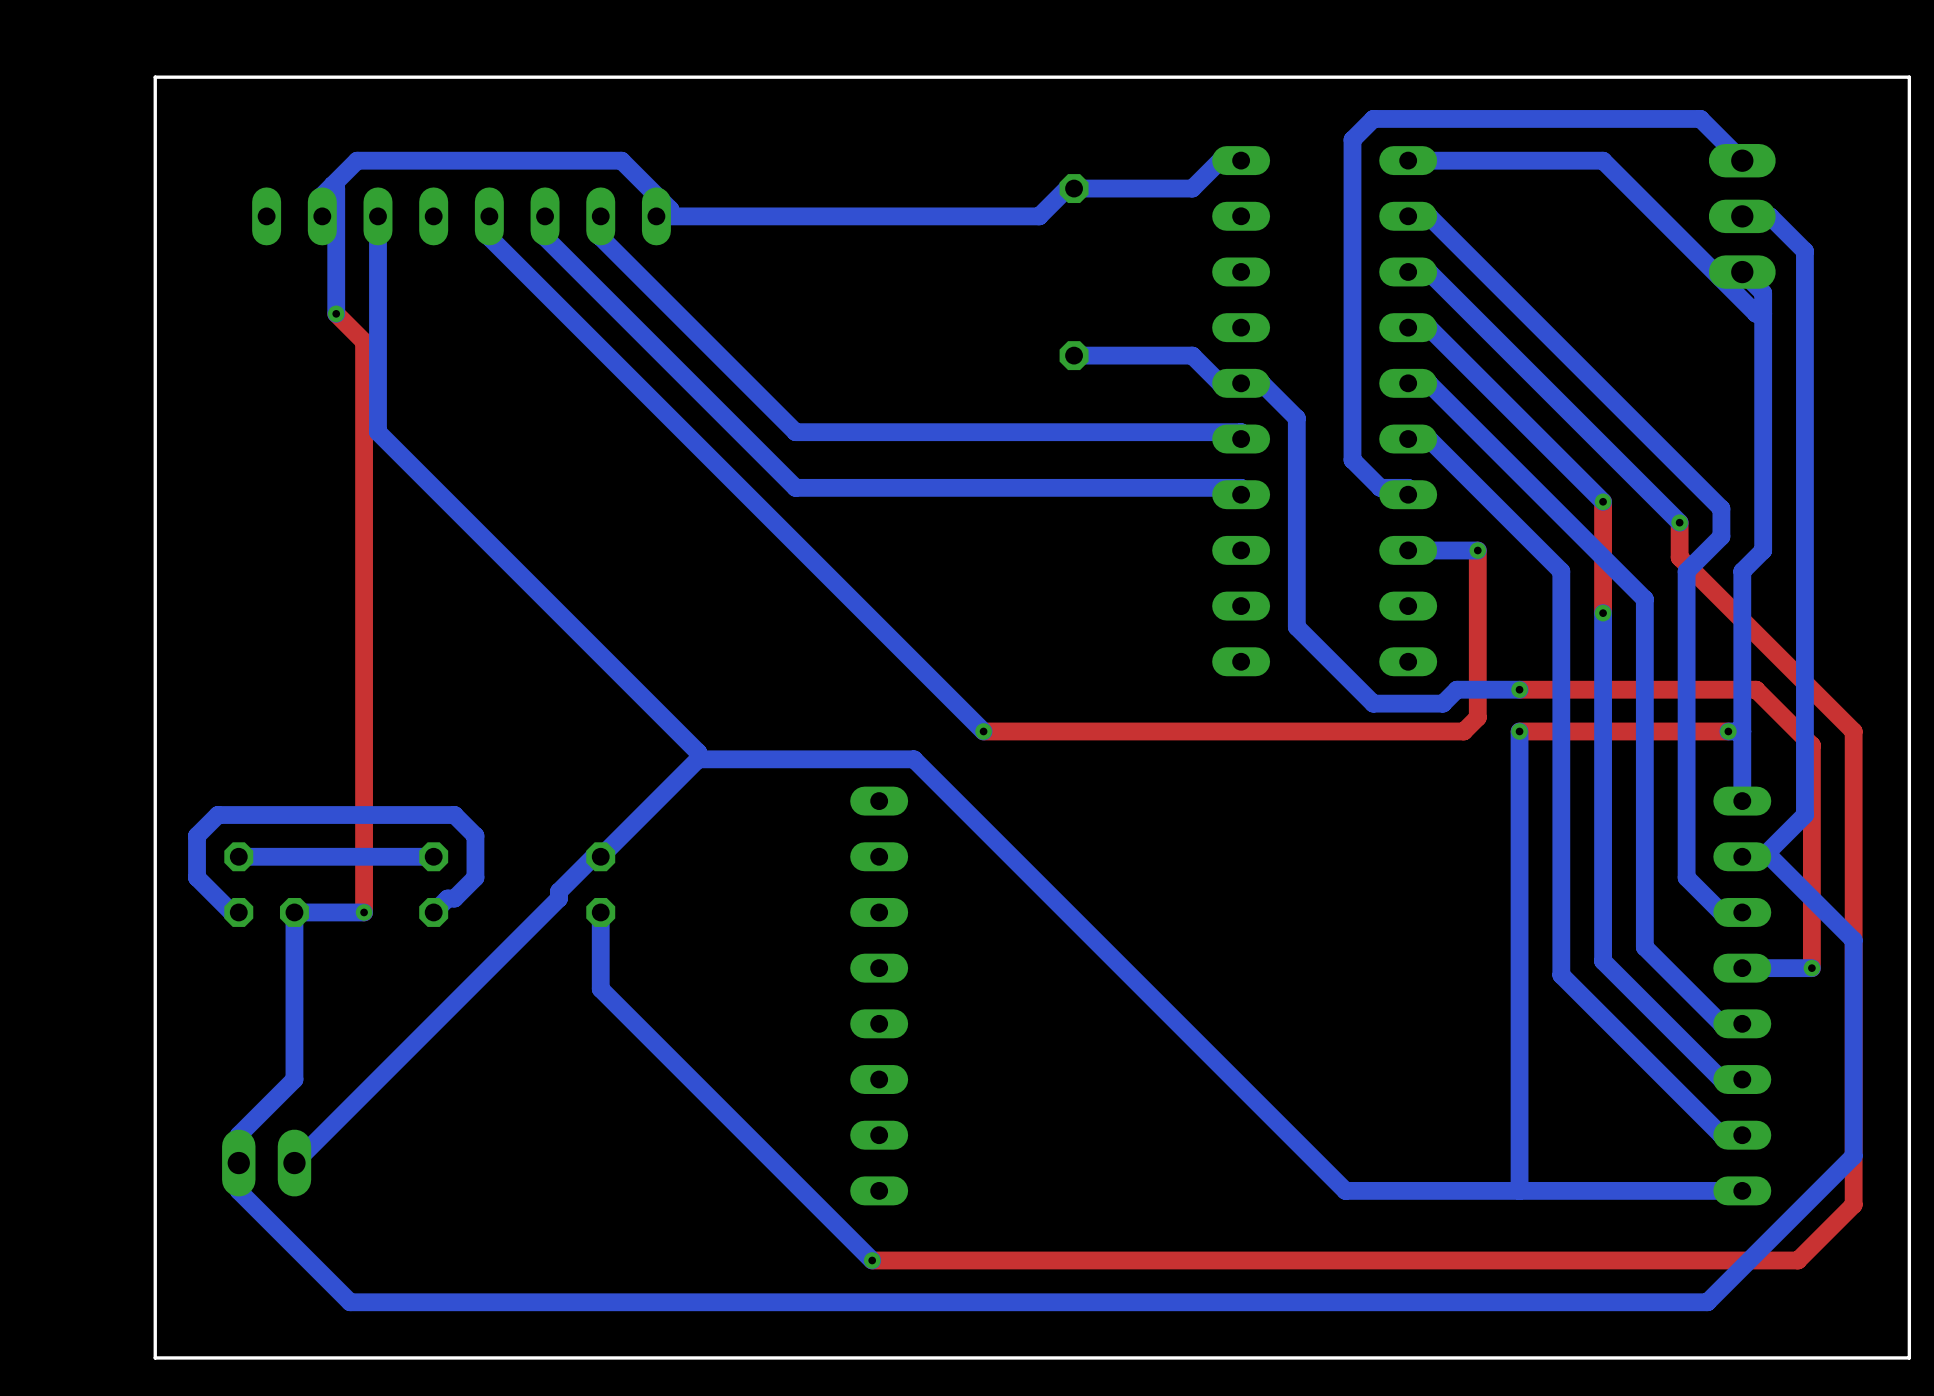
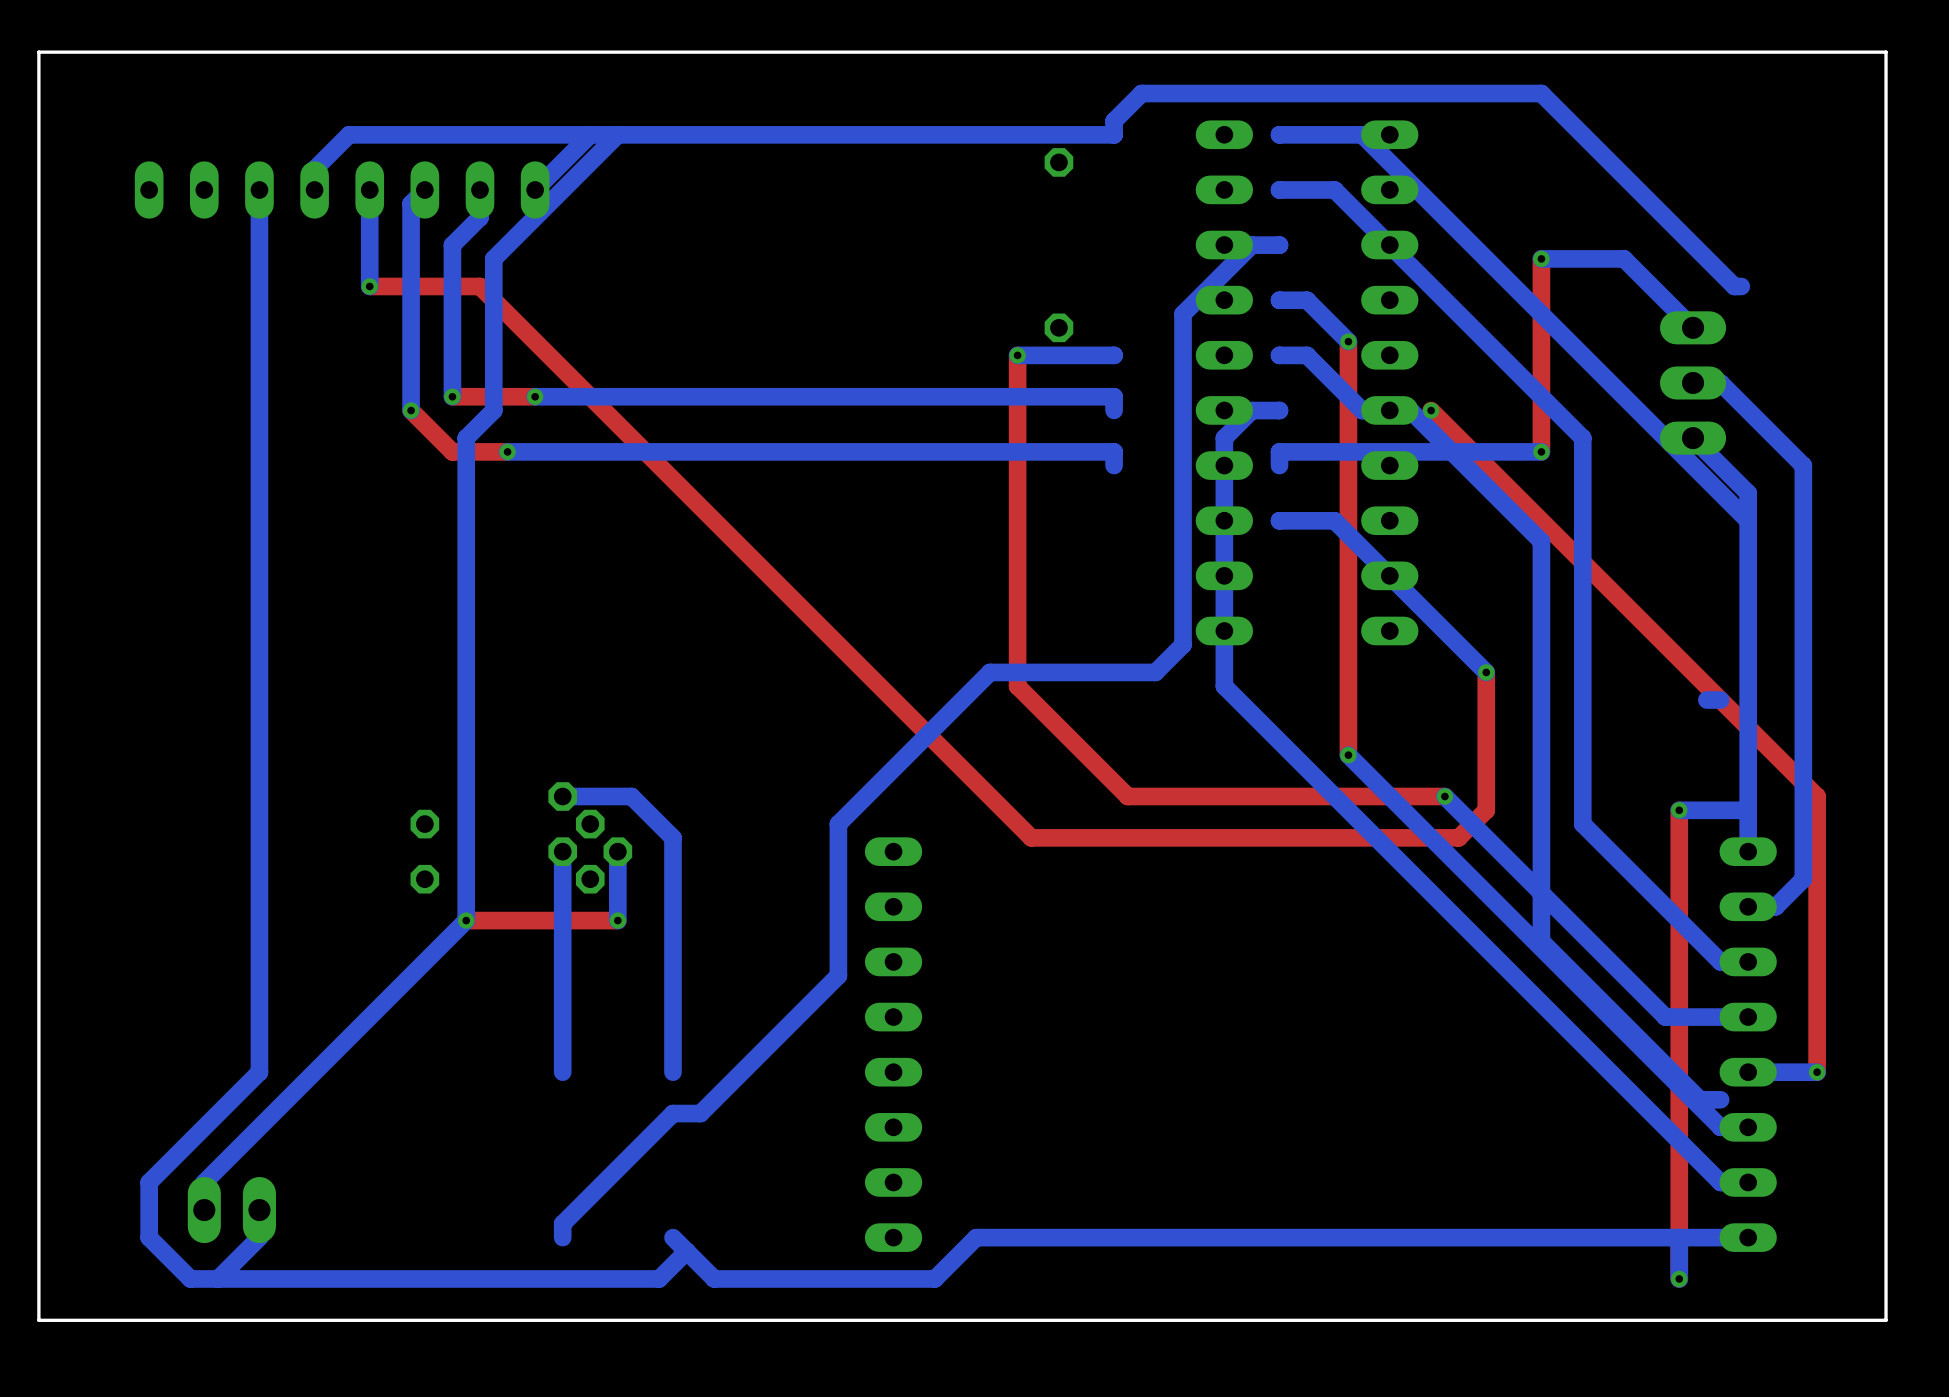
board edge: (155, 77) (155, 1357) -> (149, 52) (38, 52) (38, 1320) (149, 1320)
bottom track: (1373, 118) (1352, 139) (1352, 460) (1380, 487) (1408, 487) (1408, 494) -> none
bottom track: (1561, 118) (1700, 118) (1742, 160) -> (1541, 93) (1582, 134)
bottom track: (1241, 160) (1220, 160) (1192, 188) (1067, 188) (1039, 216) (656, 216) (670, 209) (621, 160) -> (1355, 93) (1141, 93) (1114, 121) (1114, 134) (610, 134)
bottom track: none -> (1279, 134) (1362, 134) (1748, 520)
bottom track: (1603, 160) (1408, 160) -> none
bottom track: (332, 185) (336, 188) (336, 313) -> none
bottom track: none -> (424, 189) (411, 203) (411, 410)
part position: (461, 216) -> (342, 189)
bottom track: (545, 216) (545, 237) (795, 487) (1241, 487) -> (535, 189) (590, 134)
bottom track: (600, 216) (600, 237) (795, 432) (1241, 432) (1241, 439) -> none
bottom track: none -> (1279, 189) (1334, 189) (1582, 438) (1582, 582)
bottom track: (1408, 216) (1429, 216) (1721, 508) (1721, 536) (1686, 571) (1686, 877) (1721, 912) (1742, 912) -> none
bottom track: (1742, 216) (1770, 216) (1804, 251) (1804, 815) (1763, 856) -> none
part position: (1742, 216) -> (1693, 382)
bottom track: (489, 237) (983, 731) -> (480, 210) (480, 217) (452, 245) (452, 396)
bottom track: none -> (1279, 245) (1251, 245) (1183, 314) (1183, 644) (1155, 672) (990, 672) (838, 824) (838, 975) (700, 1113) (672, 1113) (562, 1223) (562, 1237)
bottom track: (1408, 272) (1429, 272) (1679, 522) -> none
bottom track: (1742, 272) (1763, 292) (1763, 550) (1742, 571) (1742, 801) -> none
bottom track: none -> (1541, 258) (1624, 258) (1693, 327)
top track: none -> (1541, 258) (1541, 451)
via: none -> (1541, 258)
top track: (336, 313) (364, 341) (364, 912) -> none
via position: (336, 313) -> (369, 286)
bottom track: (377, 313) (377, 432) (698, 752) (698, 759) -> none
top track: none -> (369, 286) (480, 286) (1031, 837) (1458, 837) (1486, 810) (1486, 672)
bottom track: none -> (1279, 300) (1307, 300) (1348, 341)
bottom track: (1408, 327) (1429, 327) (1603, 501) -> none
bottom track: (1074, 355) (1192, 355) (1220, 383) (1262, 383) (1296, 418) (1296, 480) -> (1541, 451) (1279, 451)
top track: none -> (1348, 341) (1348, 755)
via: none -> (1348, 341)
top track: none -> (1017, 355) (1017, 686) (1127, 796) (1444, 796)
via: none -> (1017, 355)
bottom track: none -> (1114, 355) (1017, 355)
bottom track: none -> (1279, 355) (1307, 355) (1362, 410) (1389, 410)
bottom track: (1408, 383) (1429, 383) (1644, 599) (1644, 947) (1721, 1023) (1742, 1023) -> none
bottom track: none -> (1693, 382) (1720, 382) (1803, 465) (1803, 879) (1775, 906) (1748, 906)
via: none -> (452, 396)
bottom track: none -> (535, 396) (1114, 396) (1114, 410)
top track: none -> (535, 396) (452, 396)
via: none -> (535, 396)
top track: none -> (411, 410) (452, 451) (507, 451)
via: none -> (411, 410)
bottom track: none -> (1279, 410) (1251, 410) (1224, 438) (1224, 458)
top track: none -> (1431, 410) (1817, 796) (1817, 1072)
via: none -> (1431, 410)
bottom track: none -> (1693, 438) (1748, 493) (1748, 851)
bottom track: none -> (507, 451) (1114, 451) (1114, 465)
via: none -> (507, 451)
bottom track: none -> (1224, 465) (1224, 686) (1720, 1182) (1748, 1182)
bottom track: (1296, 494) (1296, 627) (1373, 703) (1442, 703) (1456, 689) (1519, 689) -> none
top track: (1603, 501) (1603, 613) -> none
via position: (1603, 501) -> (1541, 451)
top track: (1679, 522) (1679, 557) (1853, 731) (1853, 1204) (1797, 1260) (872, 1260) -> none
via: (1679, 522) -> none
bottom track: none -> (1279, 520) (1334, 520) (1486, 672)
bottom track: (1477, 550) (1408, 550) -> none
top track: (1477, 550) (1477, 717) (1463, 731) (983, 731) -> none
via: (1477, 550) -> none
via: (1603, 613) -> none
top track: (1519, 689) (1756, 689) (1811, 745) (1811, 968) -> none
via position: (1519, 689) -> (1486, 672)
via: (983, 731) -> none
bottom track: (1519, 731) (1519, 1190) -> none
via: (1519, 731) -> none
top track: (1728, 731) (1519, 731) -> none
via: (1728, 731) -> none
bottom track: (698, 759) (913, 759) (1345, 1190) (1742, 1190) -> none
bottom track: (698, 759) (600, 856) (593, 856) (558, 891) (558, 898) (294, 1163) -> none
bottom track: none -> (1348, 755) (1720, 1127) (1748, 1127)
via: none -> (1348, 755)
bottom track: none -> (562, 796) (631, 796) (672, 837) (672, 1072)
bottom track: none -> (1444, 796) (1665, 1017) (1748, 1017)
via: none -> (1444, 796)
bottom track: (475, 835) (454, 815) (217, 815) (197, 835) (197, 877) (231, 912) (238, 912) -> (466, 803) (466, 438) (493, 410) (493, 258) (617, 134)
top track: none -> (1679, 810) (1679, 1278)
via: none -> (1679, 810)
bottom track: (433, 856) (238, 856) -> none
bottom track: (1603, 856) (1603, 961) (1721, 1079) (1742, 1079) -> (1582, 824) (1720, 961) (1748, 961)
bottom track: (1742, 856) (1770, 856) (1853, 940) (1853, 1156) (1707, 1302) (350, 1302) (238, 1190) (238, 1135) -> (686, 1251) (659, 1278) (190, 1278) (149, 1237) (149, 1182) (231, 1099)
bottom track: (475, 877) (454, 898) (447, 898) (433, 912) -> (466, 844) (466, 920) (204, 1182) (204, 1210)
part position: (266, 884) -> (590, 824)
bottom track: none -> (562, 851) (562, 1072)
bottom track: none -> (617, 851) (617, 920)
bottom track: (364, 912) (294, 912) (294, 1079) (266, 1107) -> (259, 189) (259, 1072)
via position: (364, 912) -> (466, 920)
bottom track: (600, 912) (600, 989) (872, 1260) -> none
top track: none -> (617, 920) (466, 920)
via: none -> (617, 920)
bottom track: (1811, 968) (1742, 968) -> (1748, 810) (1679, 810)
via: (1811, 968) -> none
part position: (879, 995) -> (893, 1044)
part position: (1742, 995) -> (1748, 1044)
bottom track: none -> (1817, 1072) (1748, 1072)
via: none -> (1817, 1072)
part position: (266, 1163) -> (231, 1210)
bottom track: none -> (259, 1210) (259, 1237) (218, 1278)
via: (872, 1260) -> none
bottom track: none -> (1679, 1237) (1679, 1278)
bottom track: none -> (1748, 1237) (976, 1237) (934, 1278) (714, 1278) (672, 1237)
via: none -> (1679, 1278)

